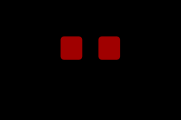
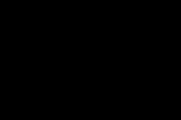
part: (90, 48) -> none

